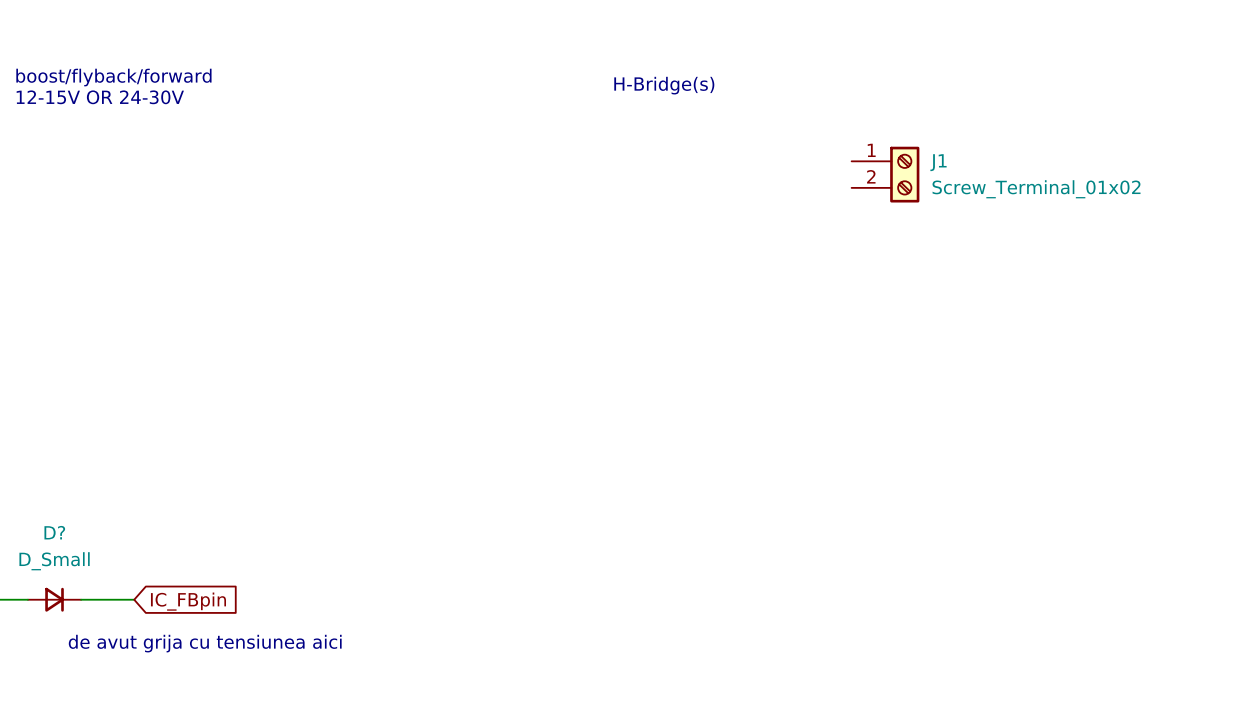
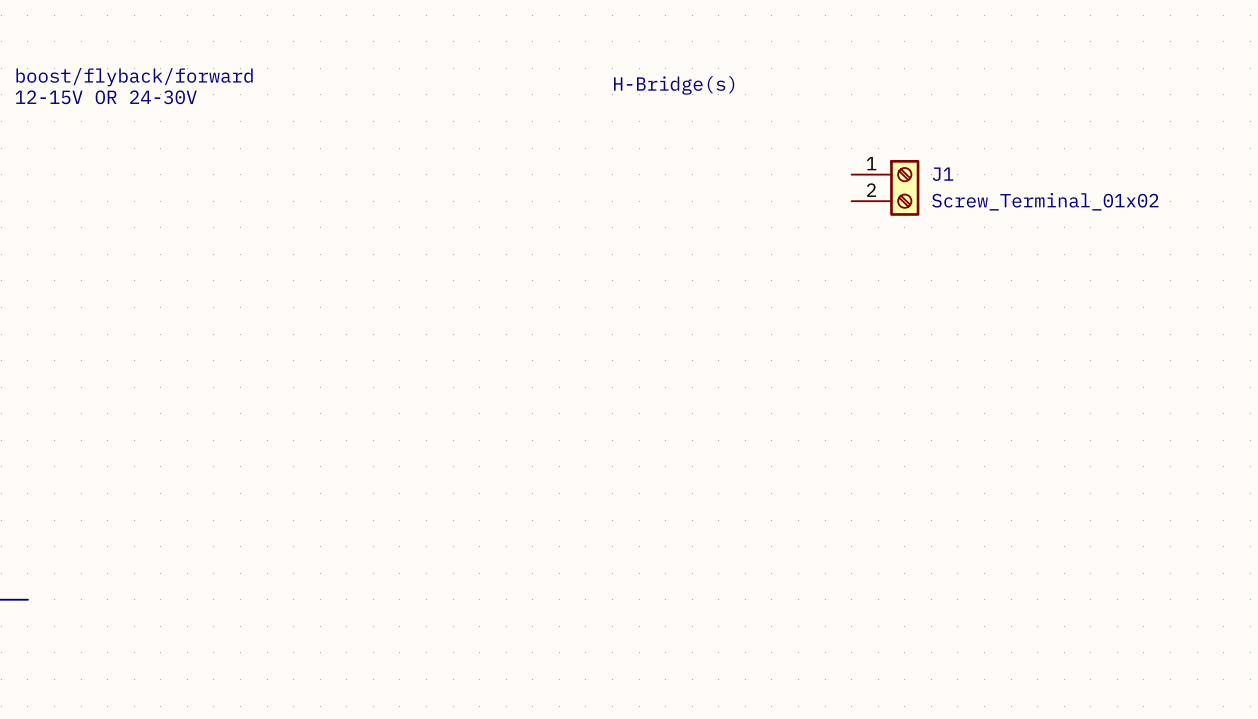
J1 position: (885, 174) -> (885, 187)
D?: D_Small (54, 599) -> none
wire: (81, 599) (134, 599) -> none
global label: IC_FBpin (188, 601) -> none
text: de avut grija cu tensiunea aici (205, 643) -> none

